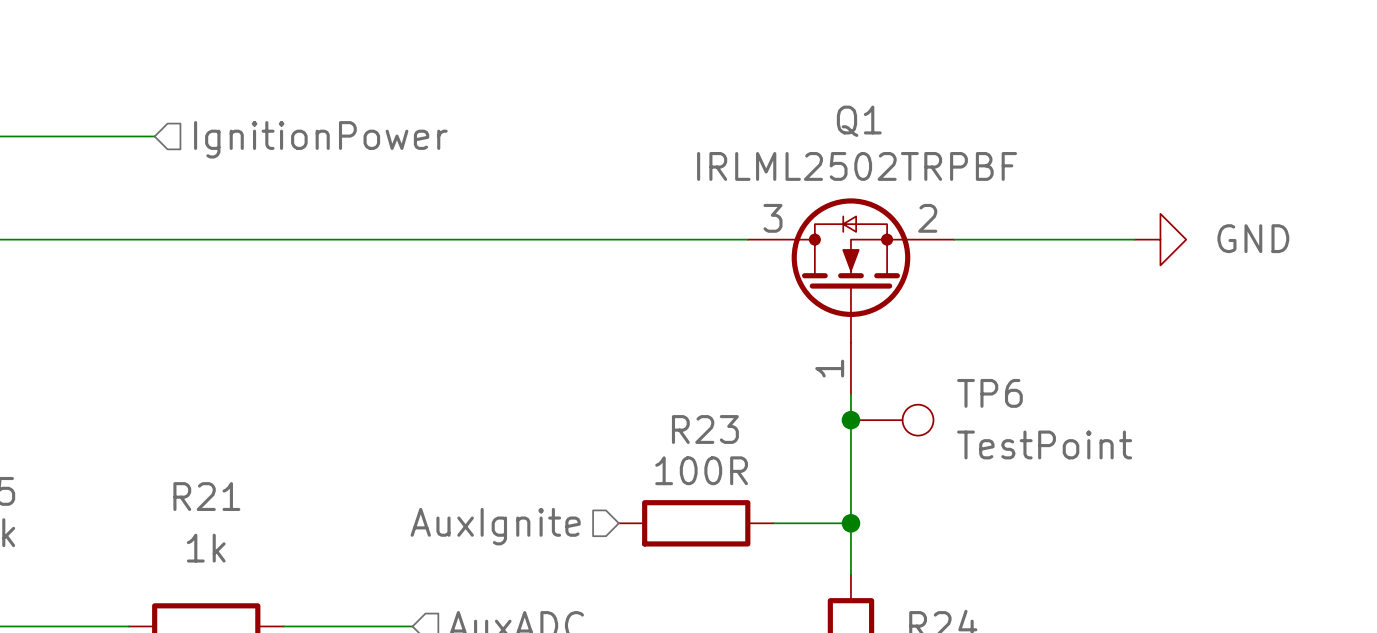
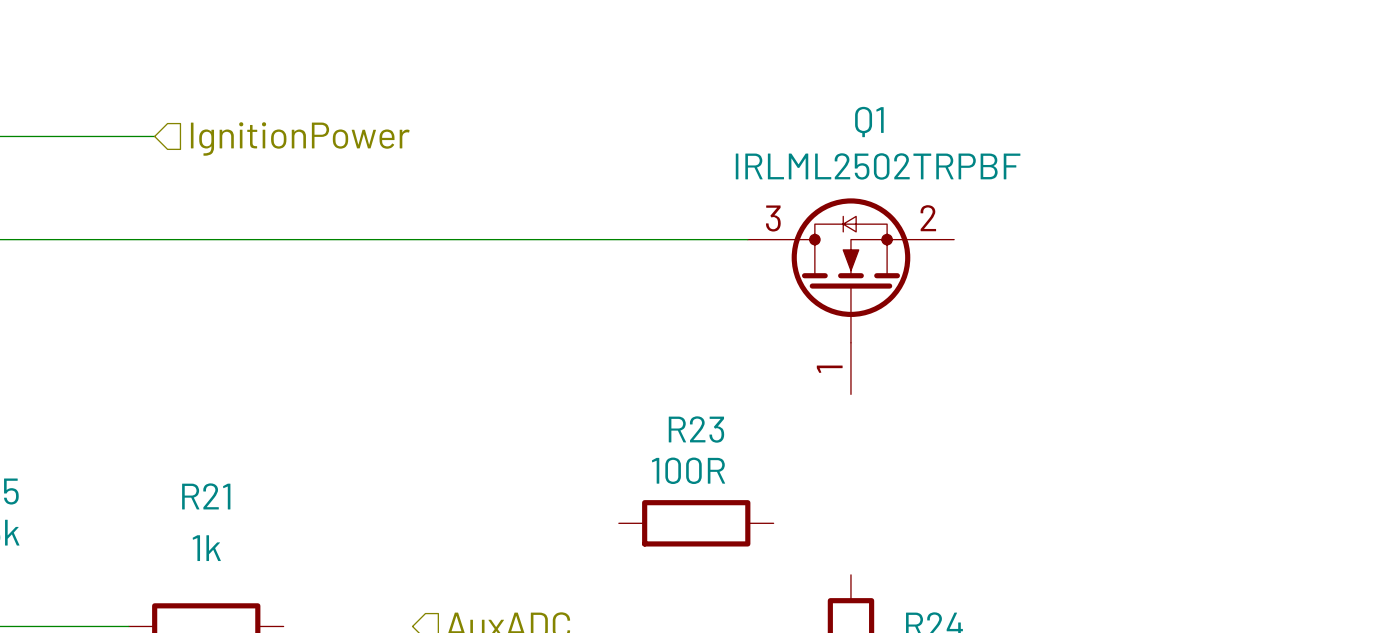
wire: (954, 239) (1134, 239) -> none
power symbol: GND (1160, 239) -> none
wire: (850, 394) (850, 574) -> none
junction: (850, 420) -> none
TP6: TestPoint (892, 420) -> none
wire: (773, 523) (850, 523) -> none
junction: (850, 523) -> none
hierarchical label: AuxIgnite (495, 526) -> none
wire: (283, 626) (412, 626) -> none

